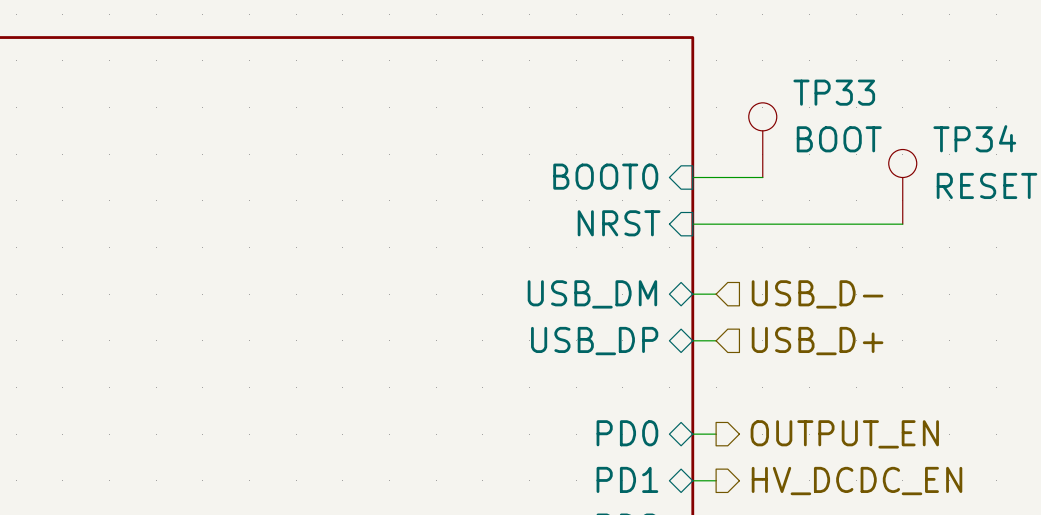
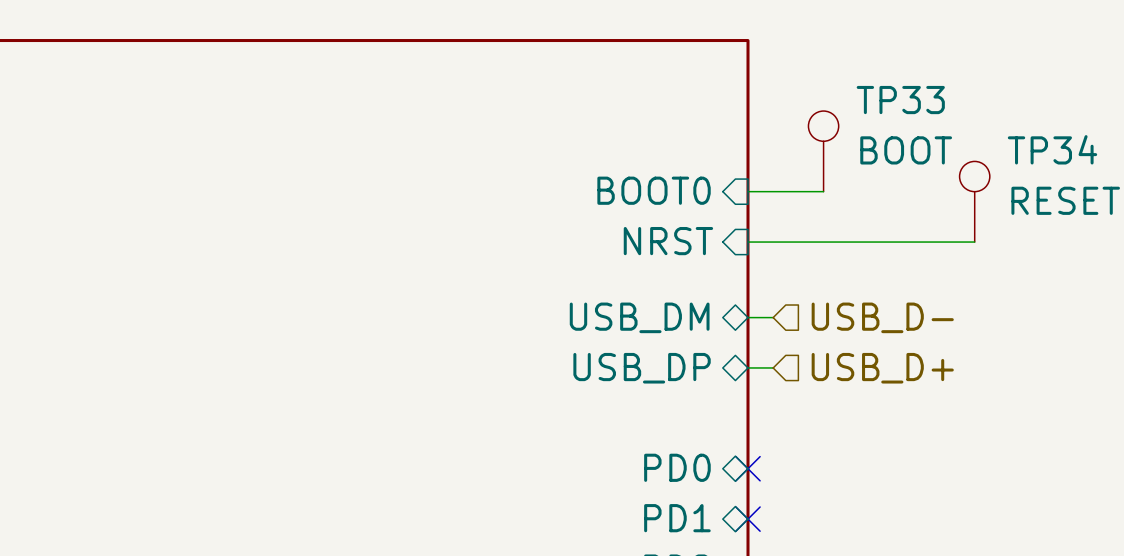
wire: (692, 434) (716, 434) -> none
no-connect mark: none -> (748, 468)
hierarchical label: OUTPUT_EN (844, 434) -> none
wire: (692, 480) (716, 480) -> none
no-connect mark: none -> (748, 519)
hierarchical label: HV_DCDC_EN (857, 481) -> none

